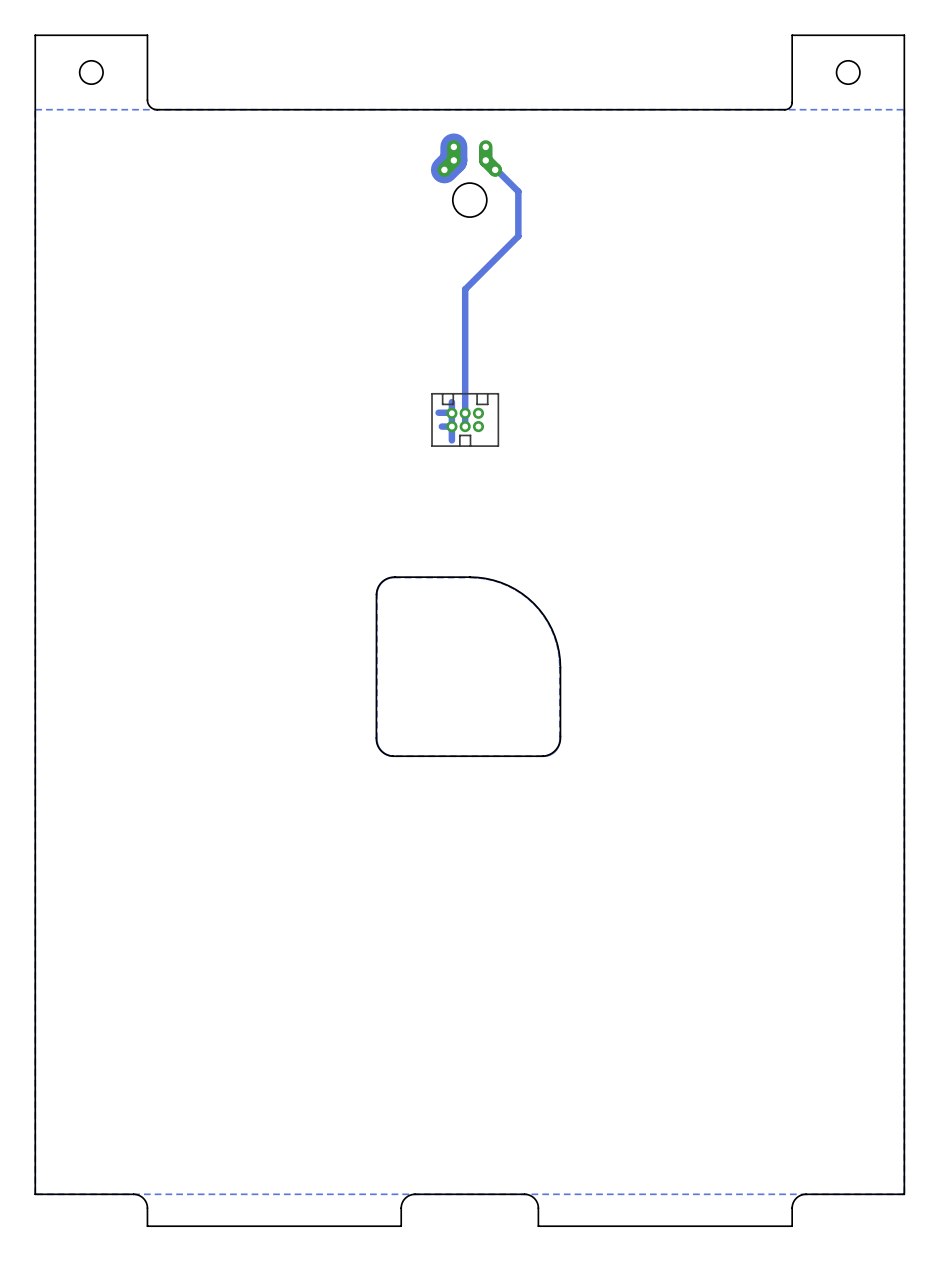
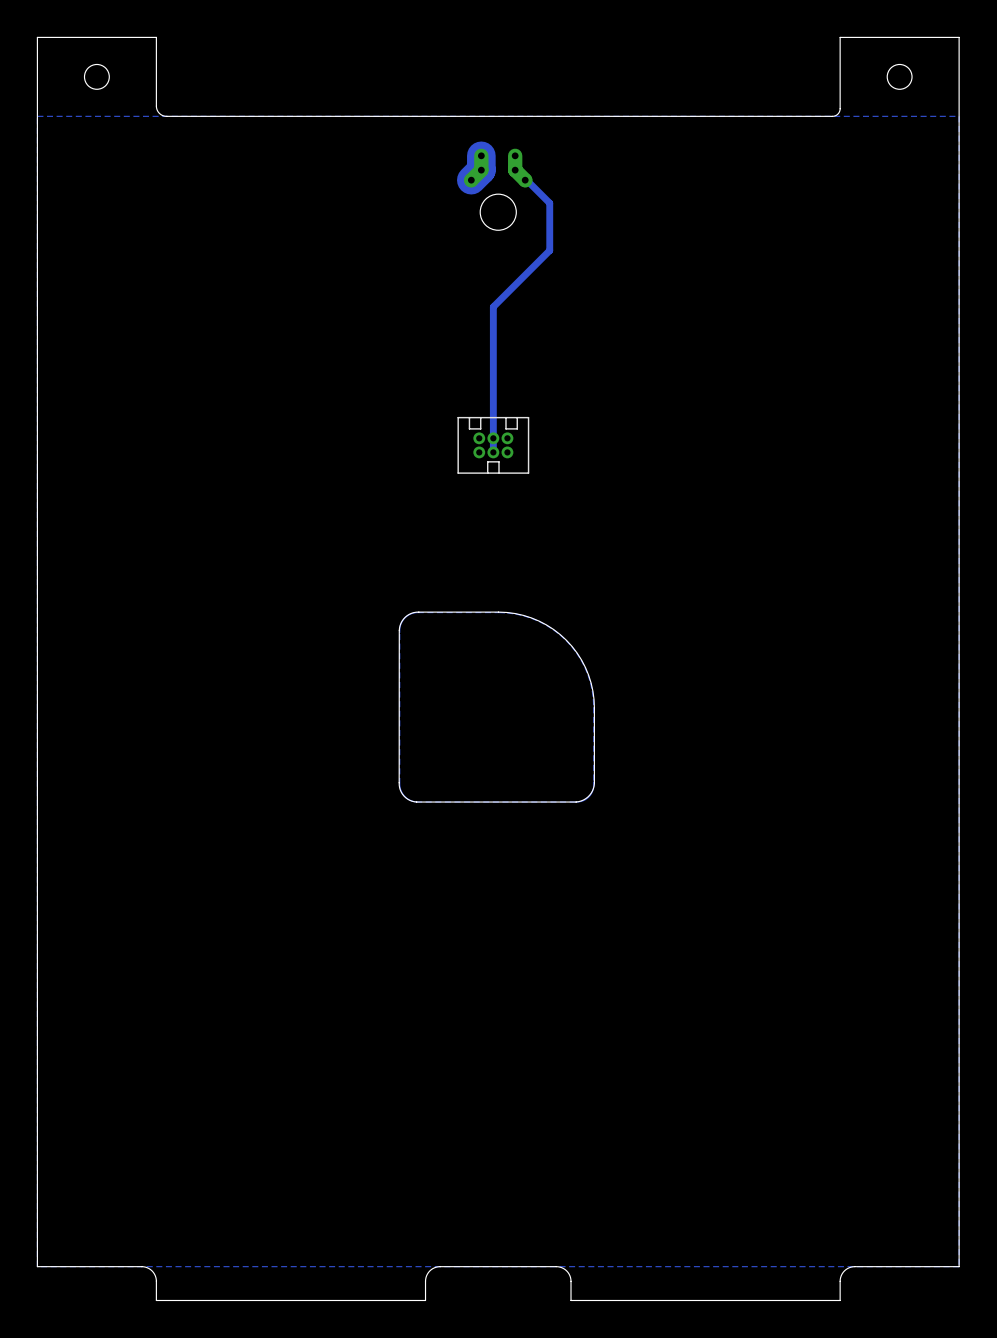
track: (451, 402) (451, 440) -> none
track: (452, 412) (438, 412) -> none
track: (451, 426) (441, 426) -> none

